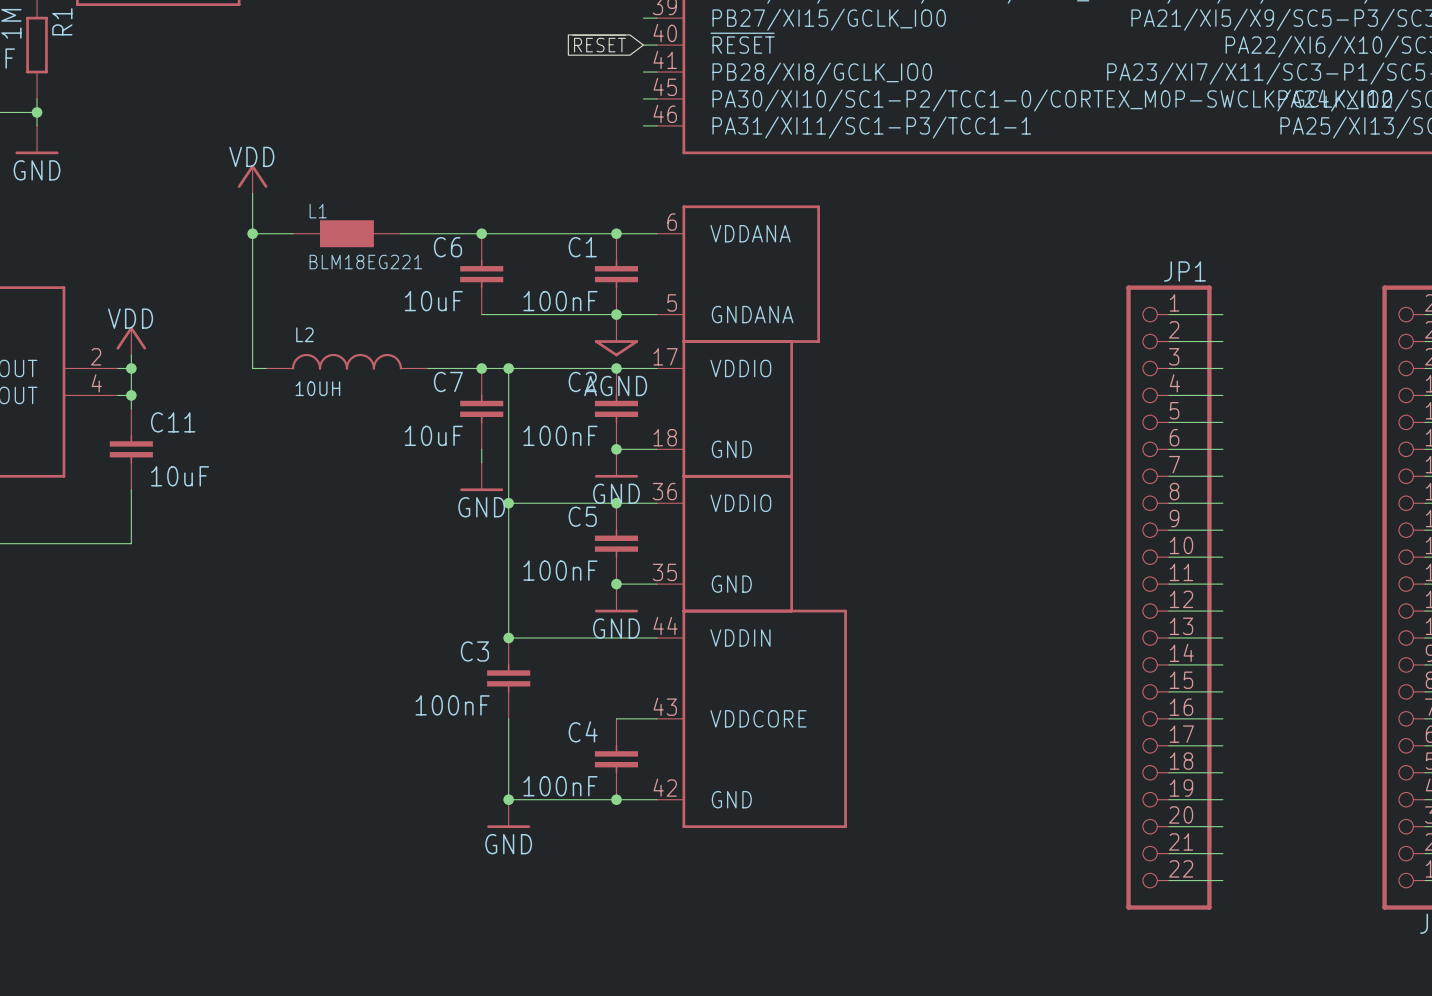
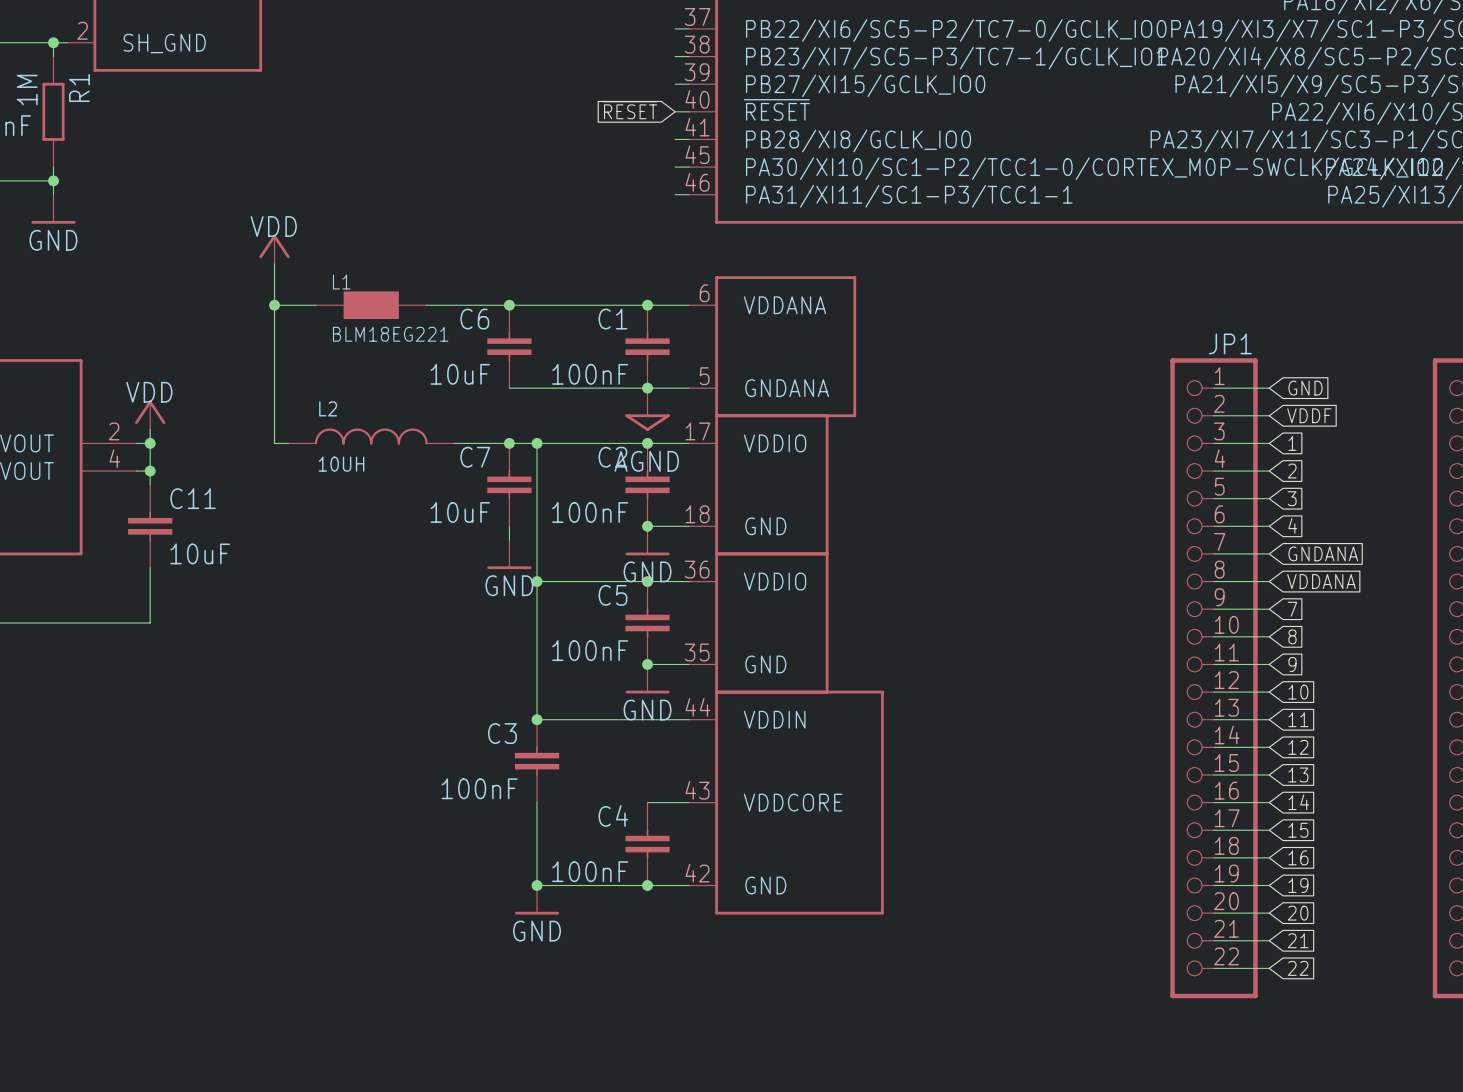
global label: none -> GND (1305, 388)
global label: none -> VDDF (1309, 415)
global label: none -> 1 (1292, 443)
global label: none -> 2 (1292, 471)
global label: none -> 3 (1292, 498)
global label: none -> 4 (1292, 525)
global label: none -> GNDANA (1323, 553)
global label: none -> VDDANA (1321, 581)
global label: none -> 7 (1292, 609)
global label: none -> 8 (1292, 636)
global label: none -> 9 (1292, 664)
global label: none -> 10 (1298, 692)
global label: none -> 11 (1298, 719)
global label: none -> 12 (1298, 747)
global label: none -> 13 (1298, 774)
global label: none -> 14 (1298, 802)
global label: none -> 15 (1298, 830)
global label: none -> 16 (1298, 857)
global label: none -> 19 (1298, 885)
global label: none -> 20 (1298, 913)
global label: none -> 21 (1298, 940)
global label: none -> 22 (1298, 968)

